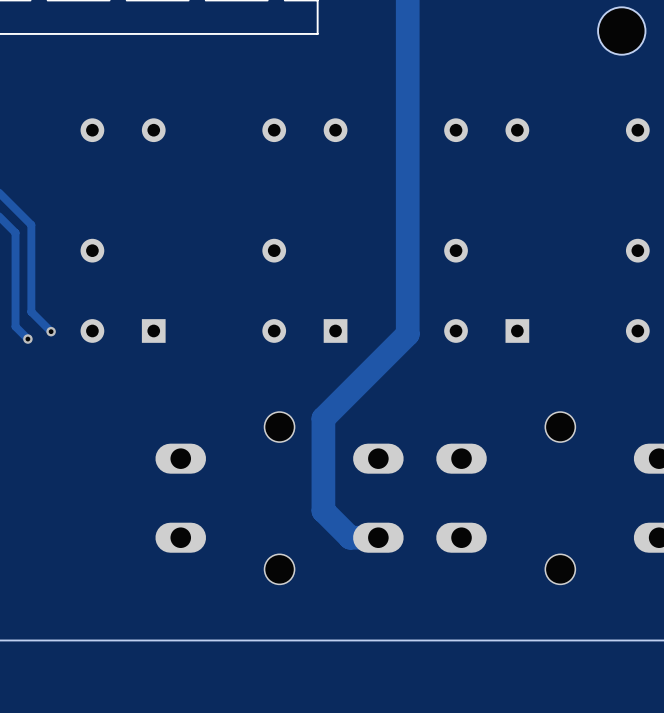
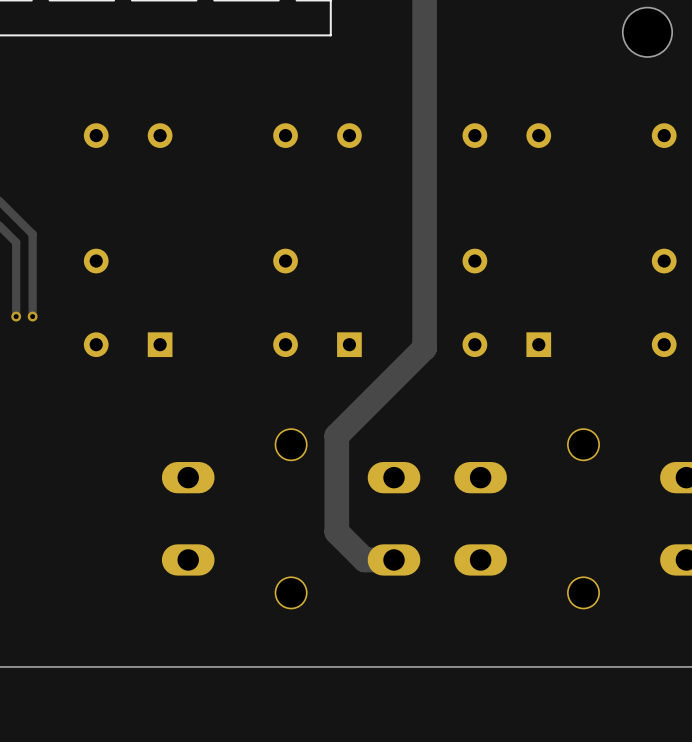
track: (15, 303) (15, 326) (27, 339) -> none
via: none -> (16, 316)
track: (31, 303) (31, 311) (51, 331) -> none
via: none -> (32, 316)
via: (51, 331) -> none
via: (27, 339) -> none

